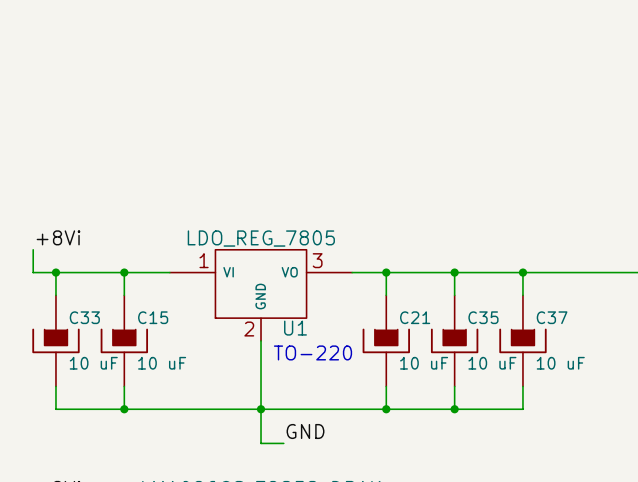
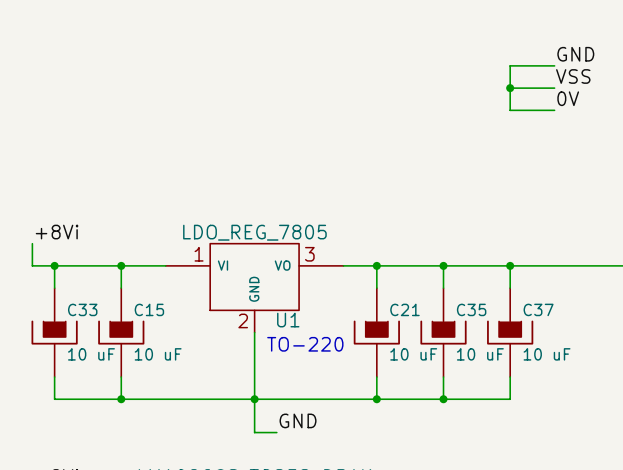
label: none -> GND (575, 54)
wire: none -> (554, 65) (510, 65) (510, 110) (554, 110)
label: none -> VSS (573, 76)
wire: none -> (510, 88) (554, 88)
junction: none -> (510, 88)
label: none -> 0V (568, 98)

